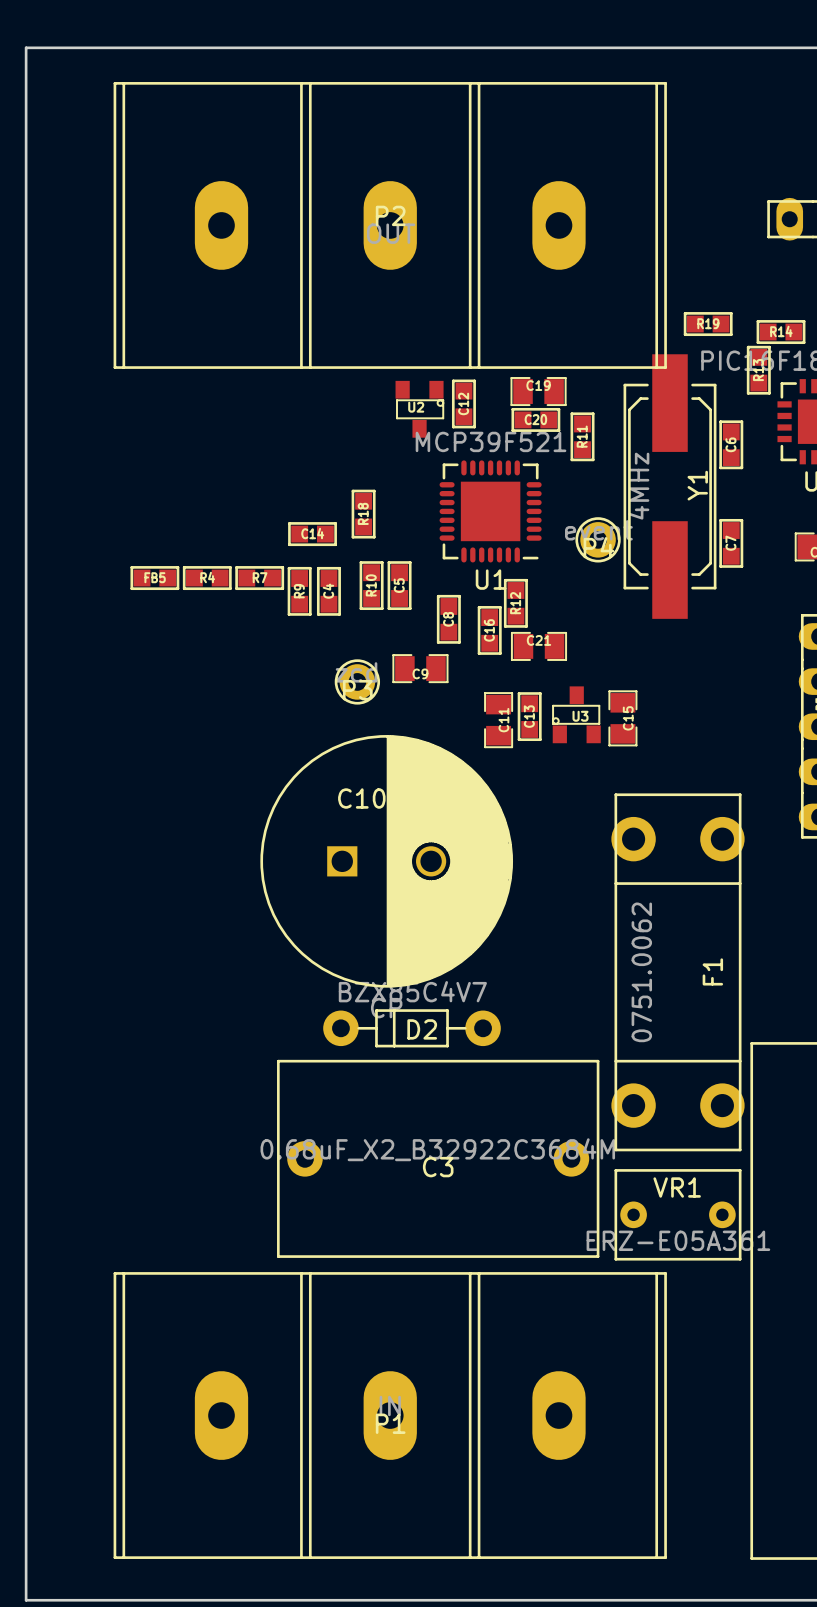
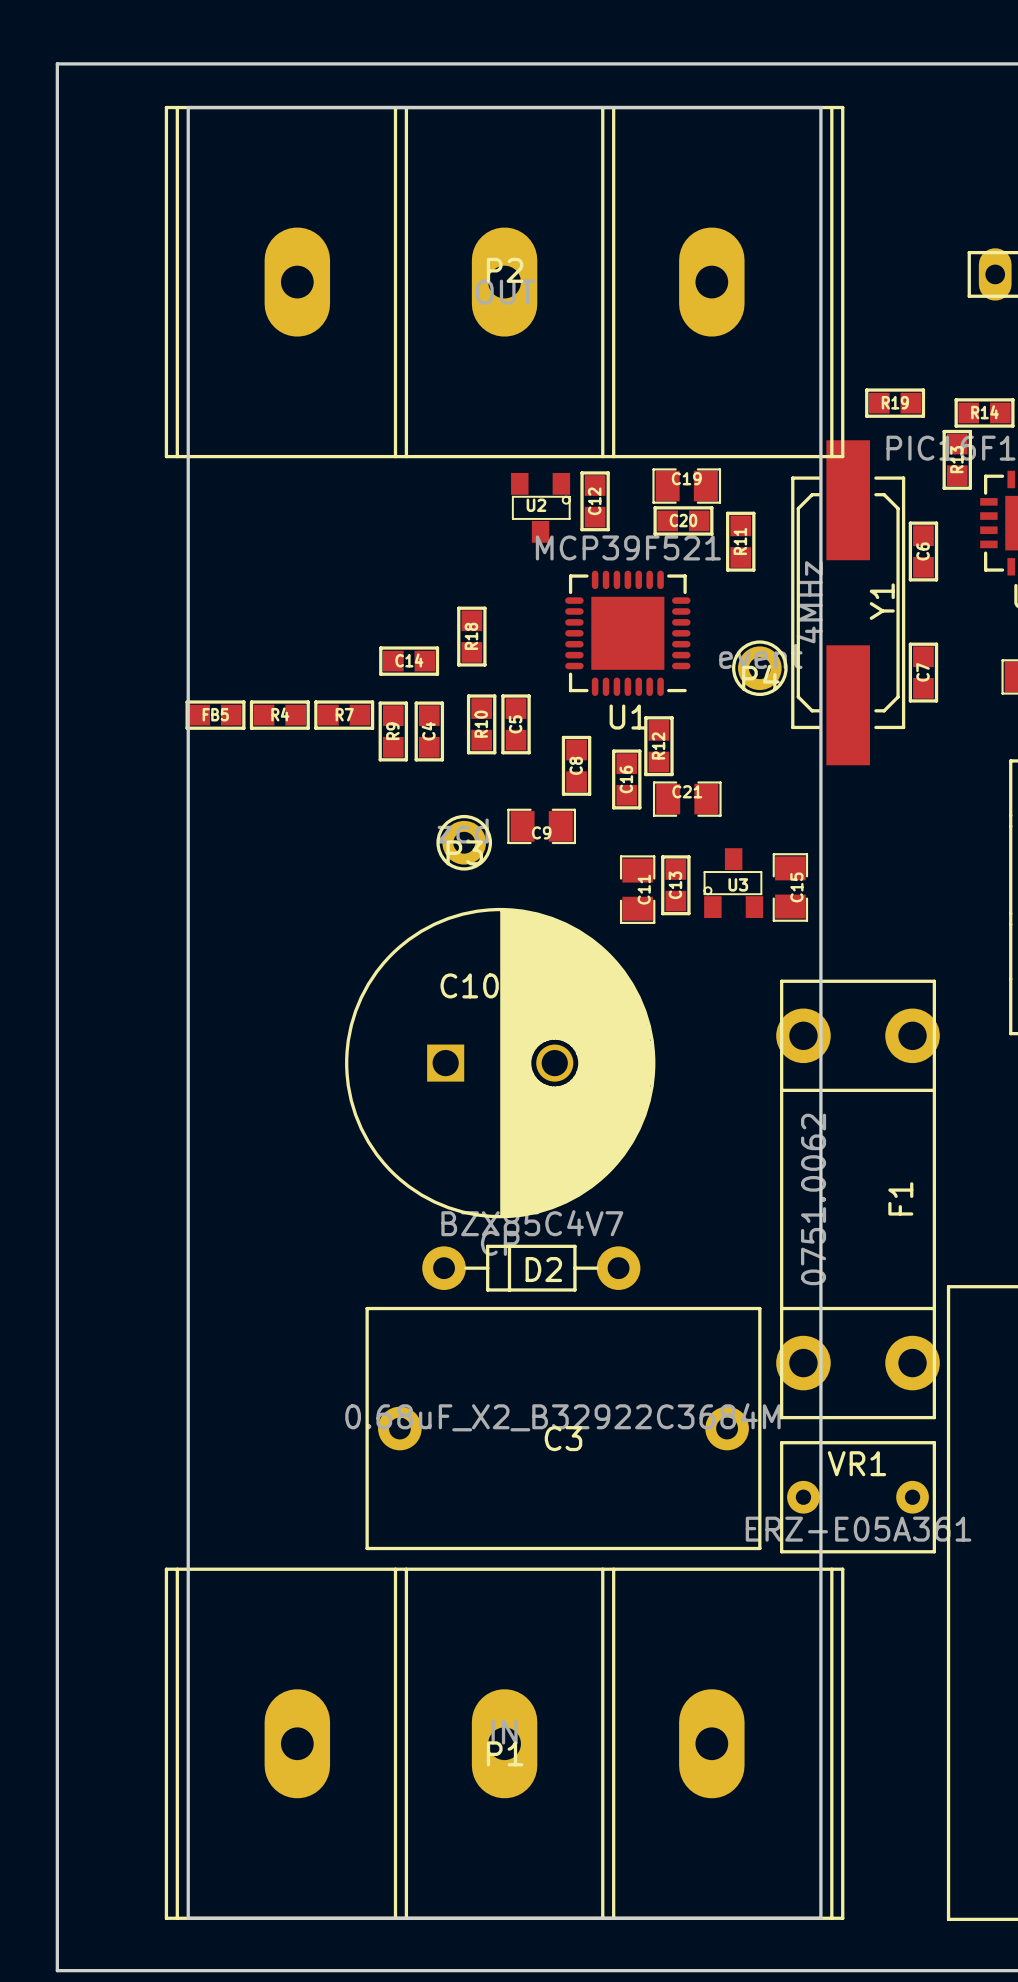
board edge: none -> (188, 107) (188, 1918) (820, 1918) (820, 107) (188, 107)

